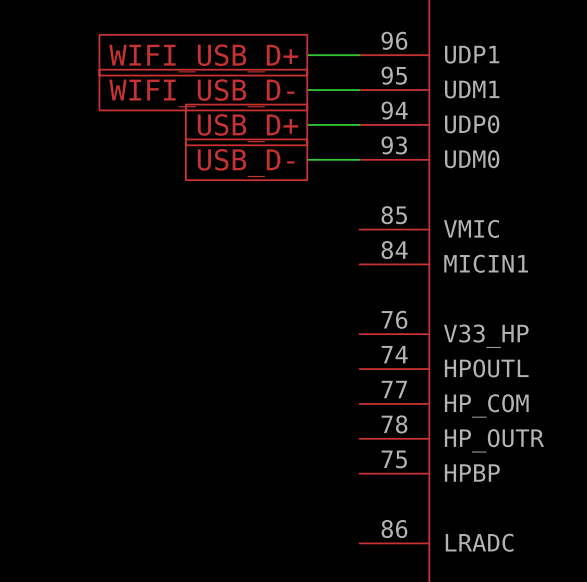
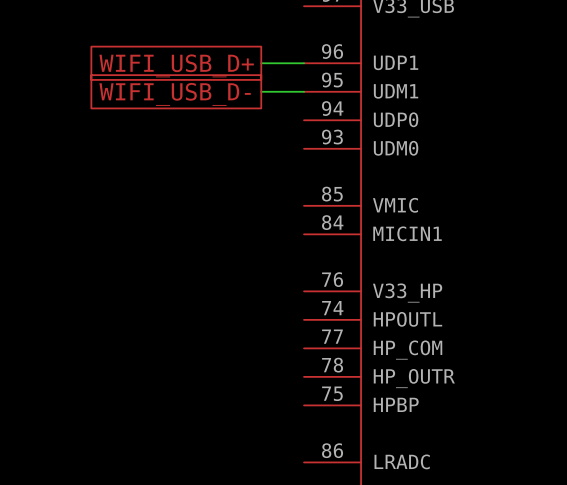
wire: (307, 124) (359, 124) -> none
global label: USB_D+ (248, 128) -> none
wire: (307, 159) (359, 159) -> none
global label: USB_D- (246, 163) -> none

